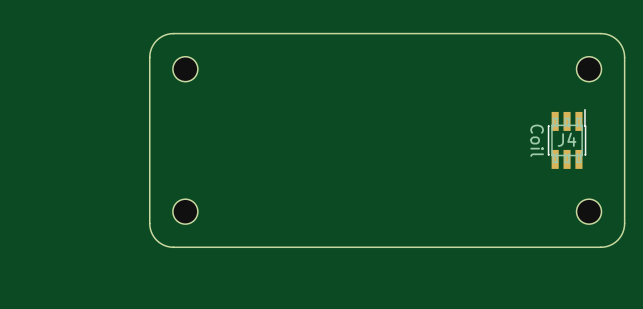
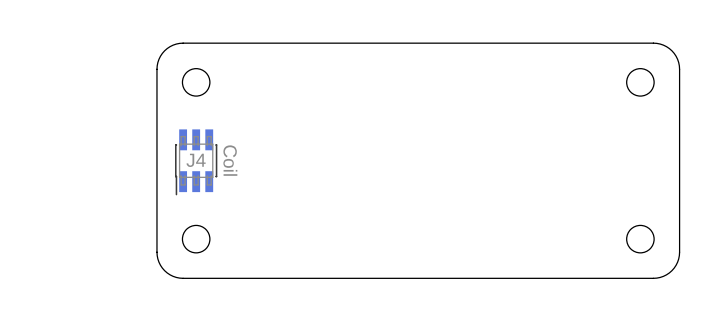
J4 rotation: 0° (567, 138) -> 180° (196, 162)
J4 position: (567, 138) -> (196, 162)

